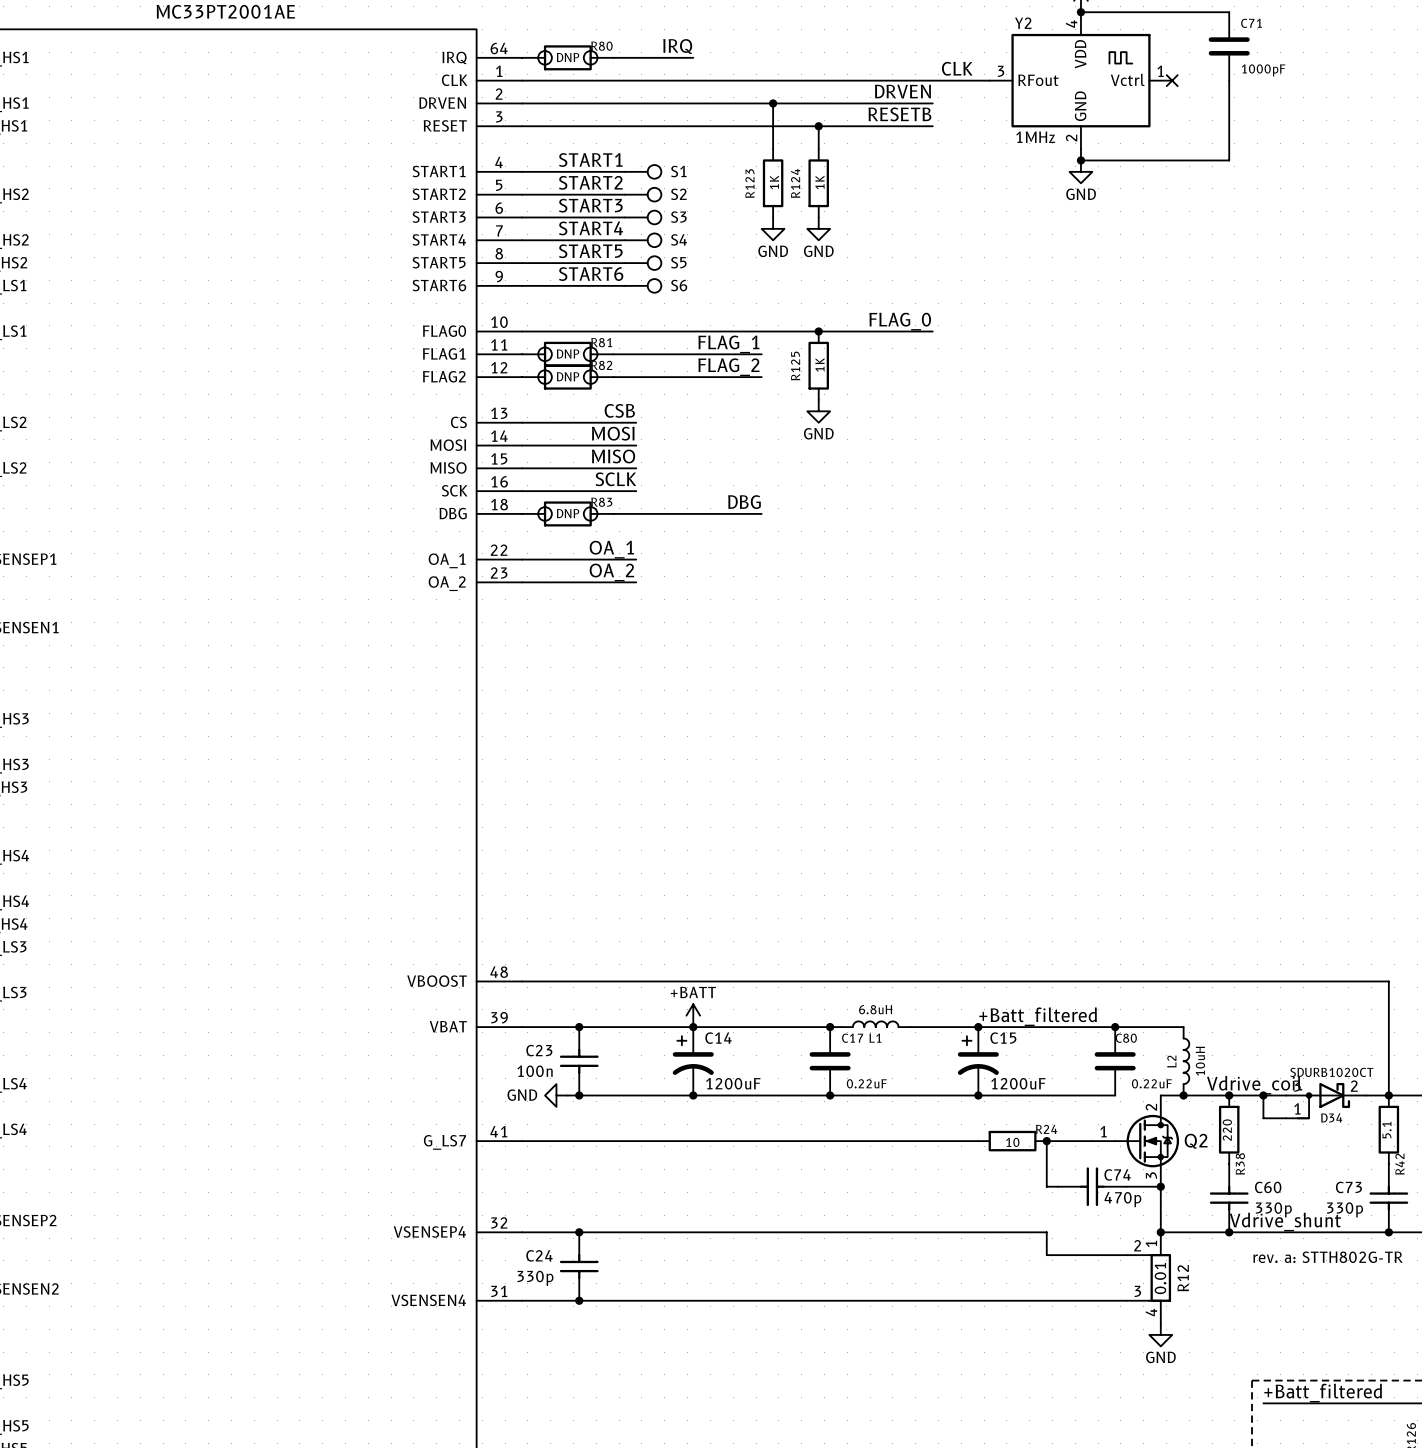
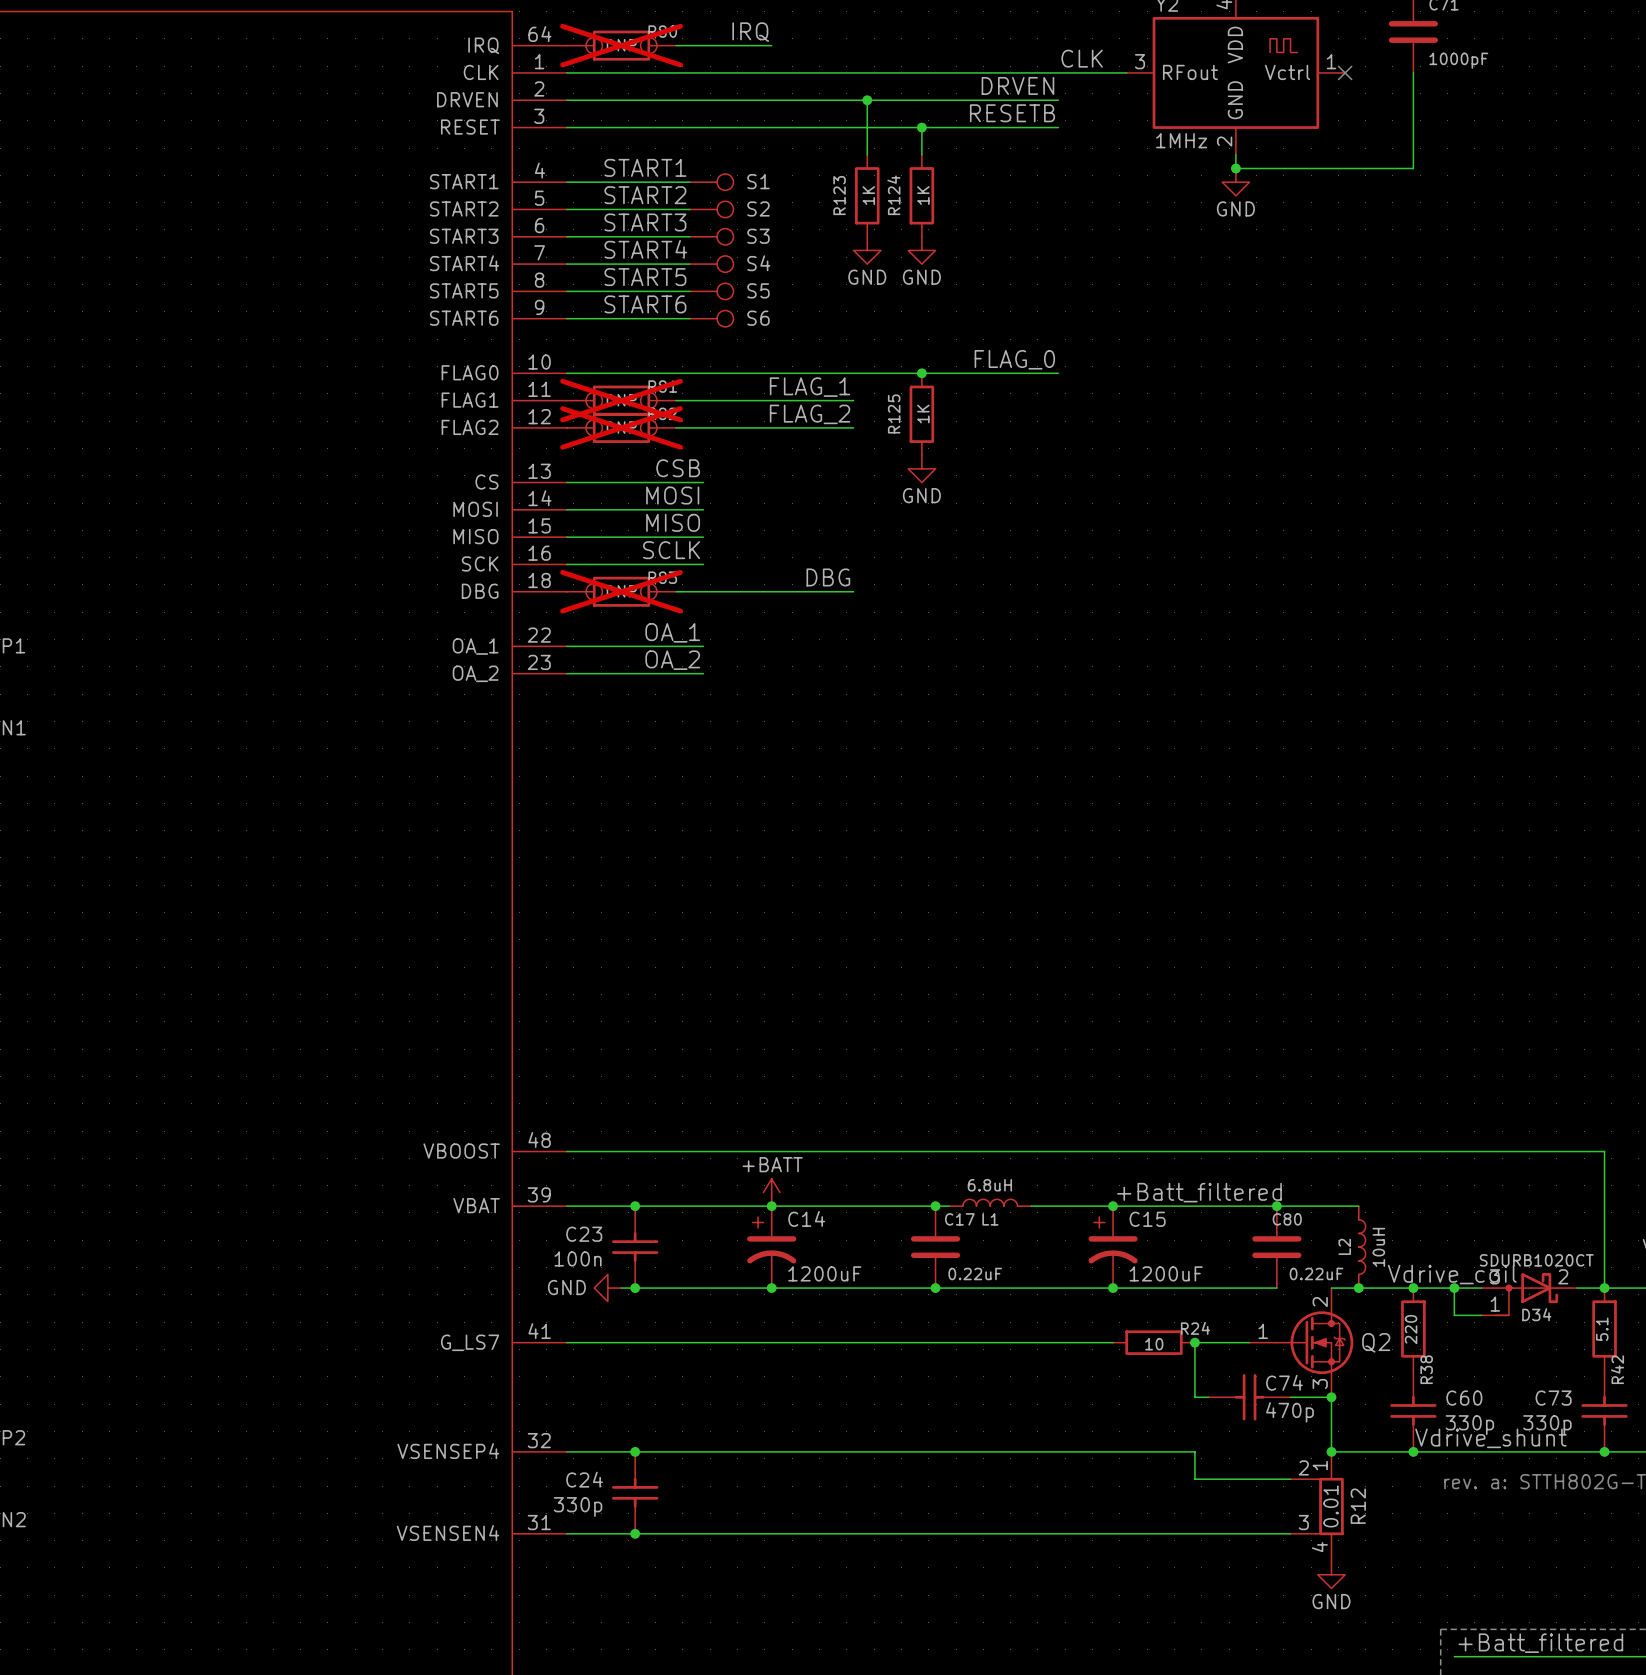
R80 do-not-place cross: none -> (621, 45)
R81 do-not-place cross: none -> (621, 400)
R82 do-not-place cross: none -> (621, 427)
R83 do-not-place cross: none -> (621, 591)

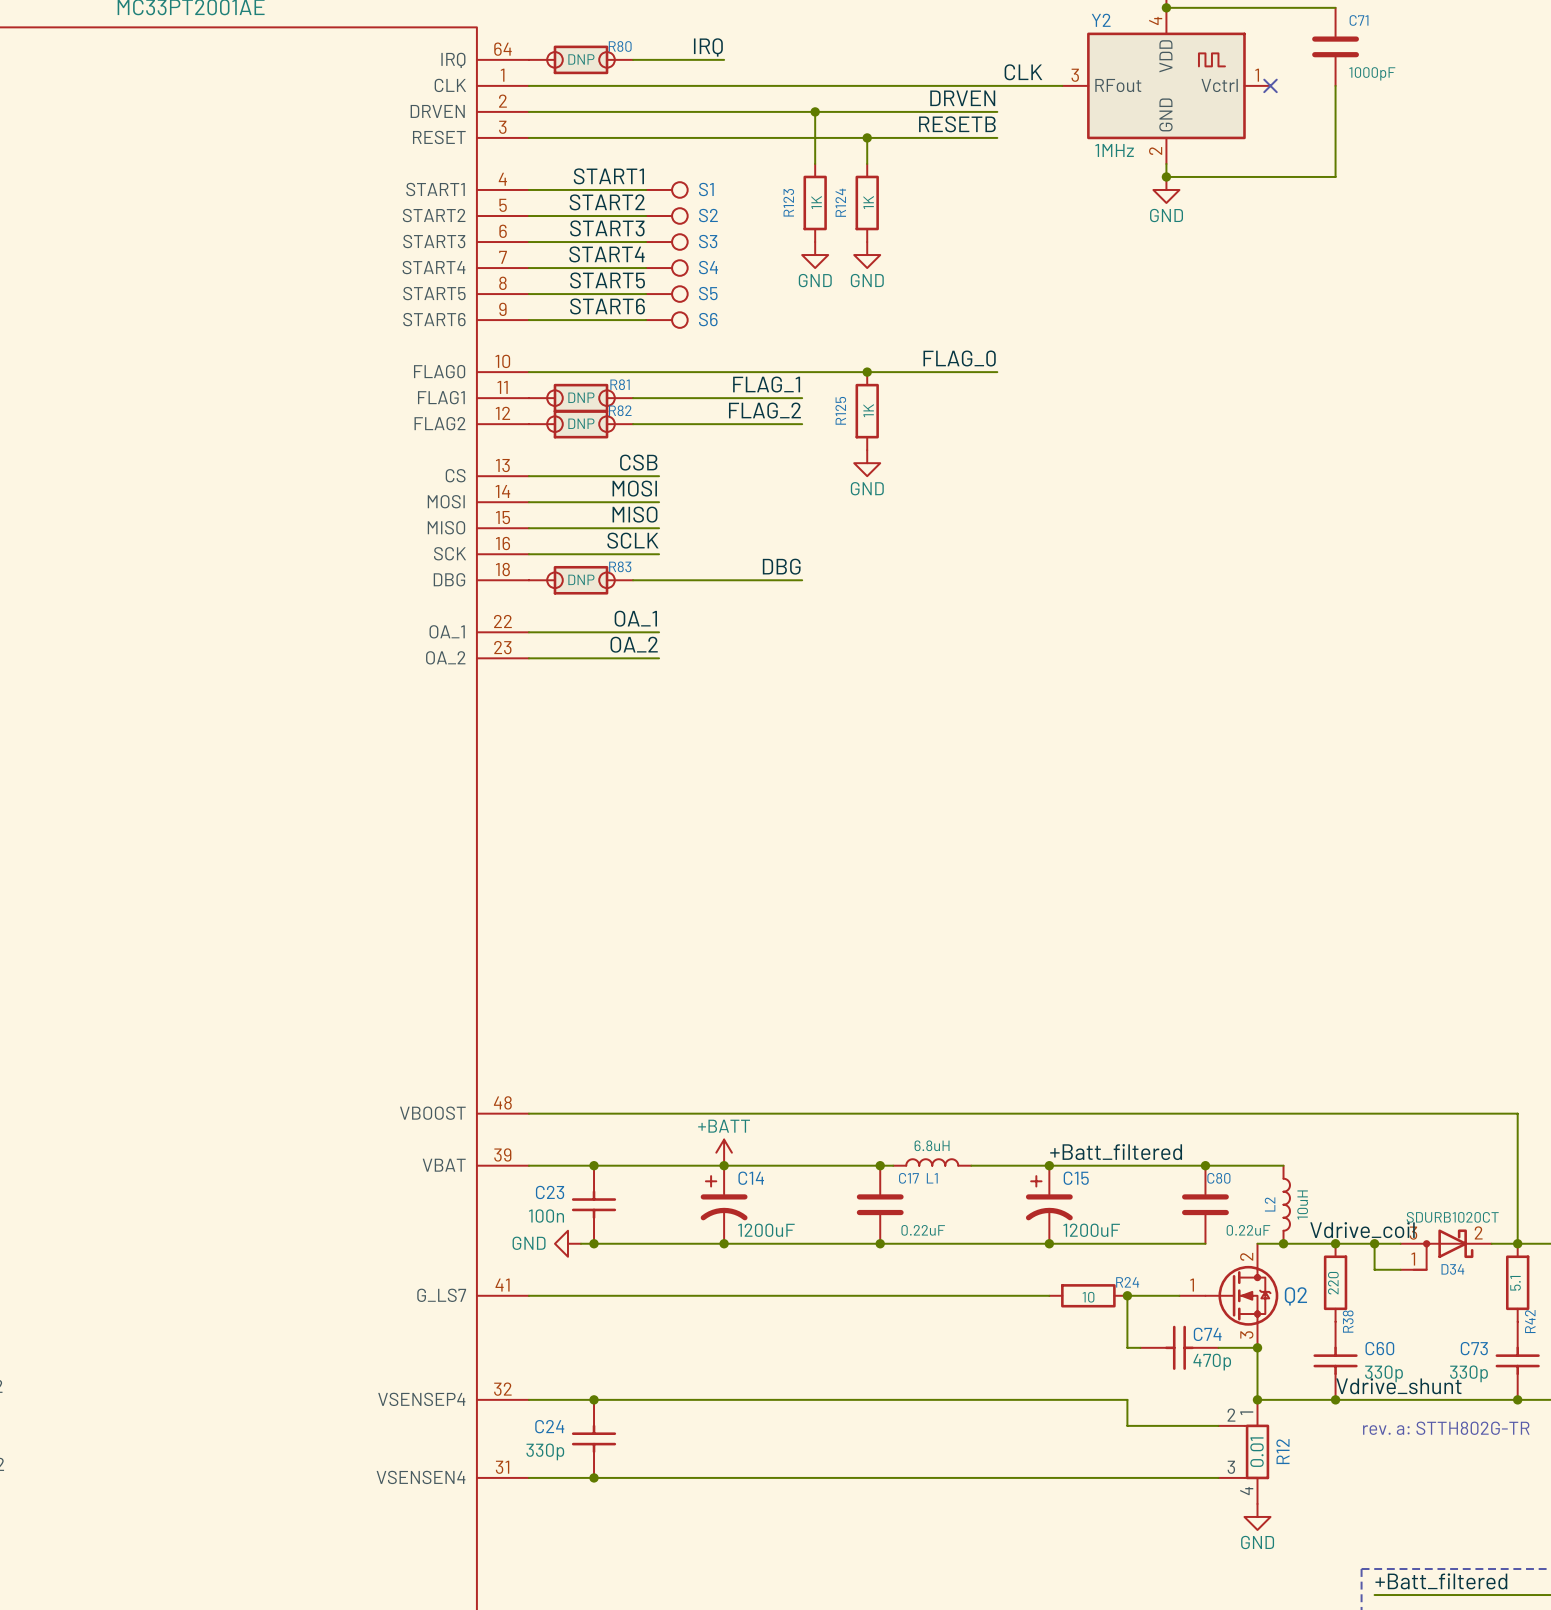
R80 do-not-place cross: (621, 45) -> none
R81 do-not-place cross: (621, 400) -> none
R82 do-not-place cross: (621, 427) -> none
R83 do-not-place cross: (621, 591) -> none

